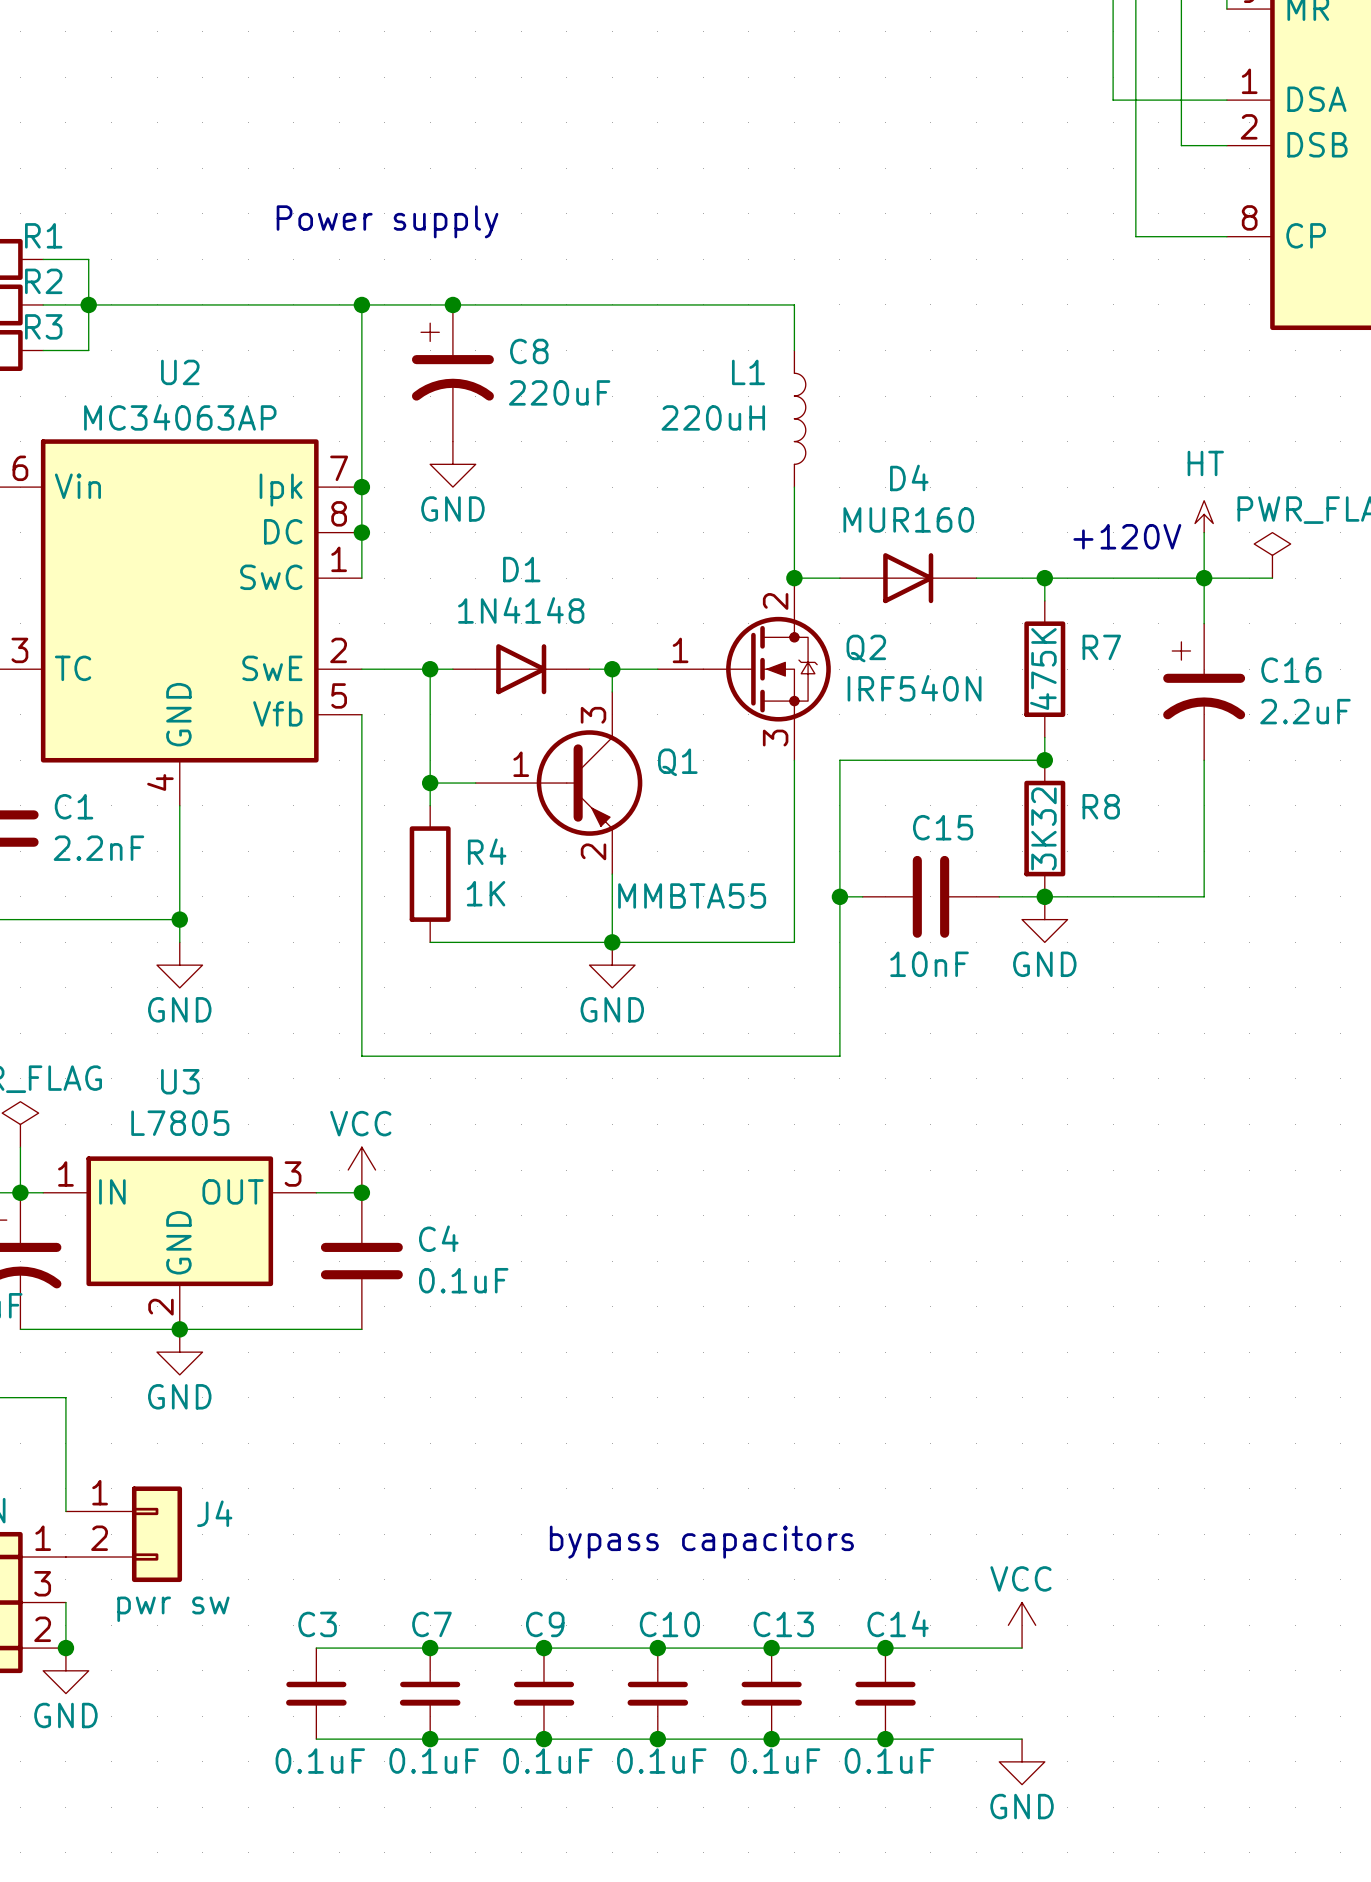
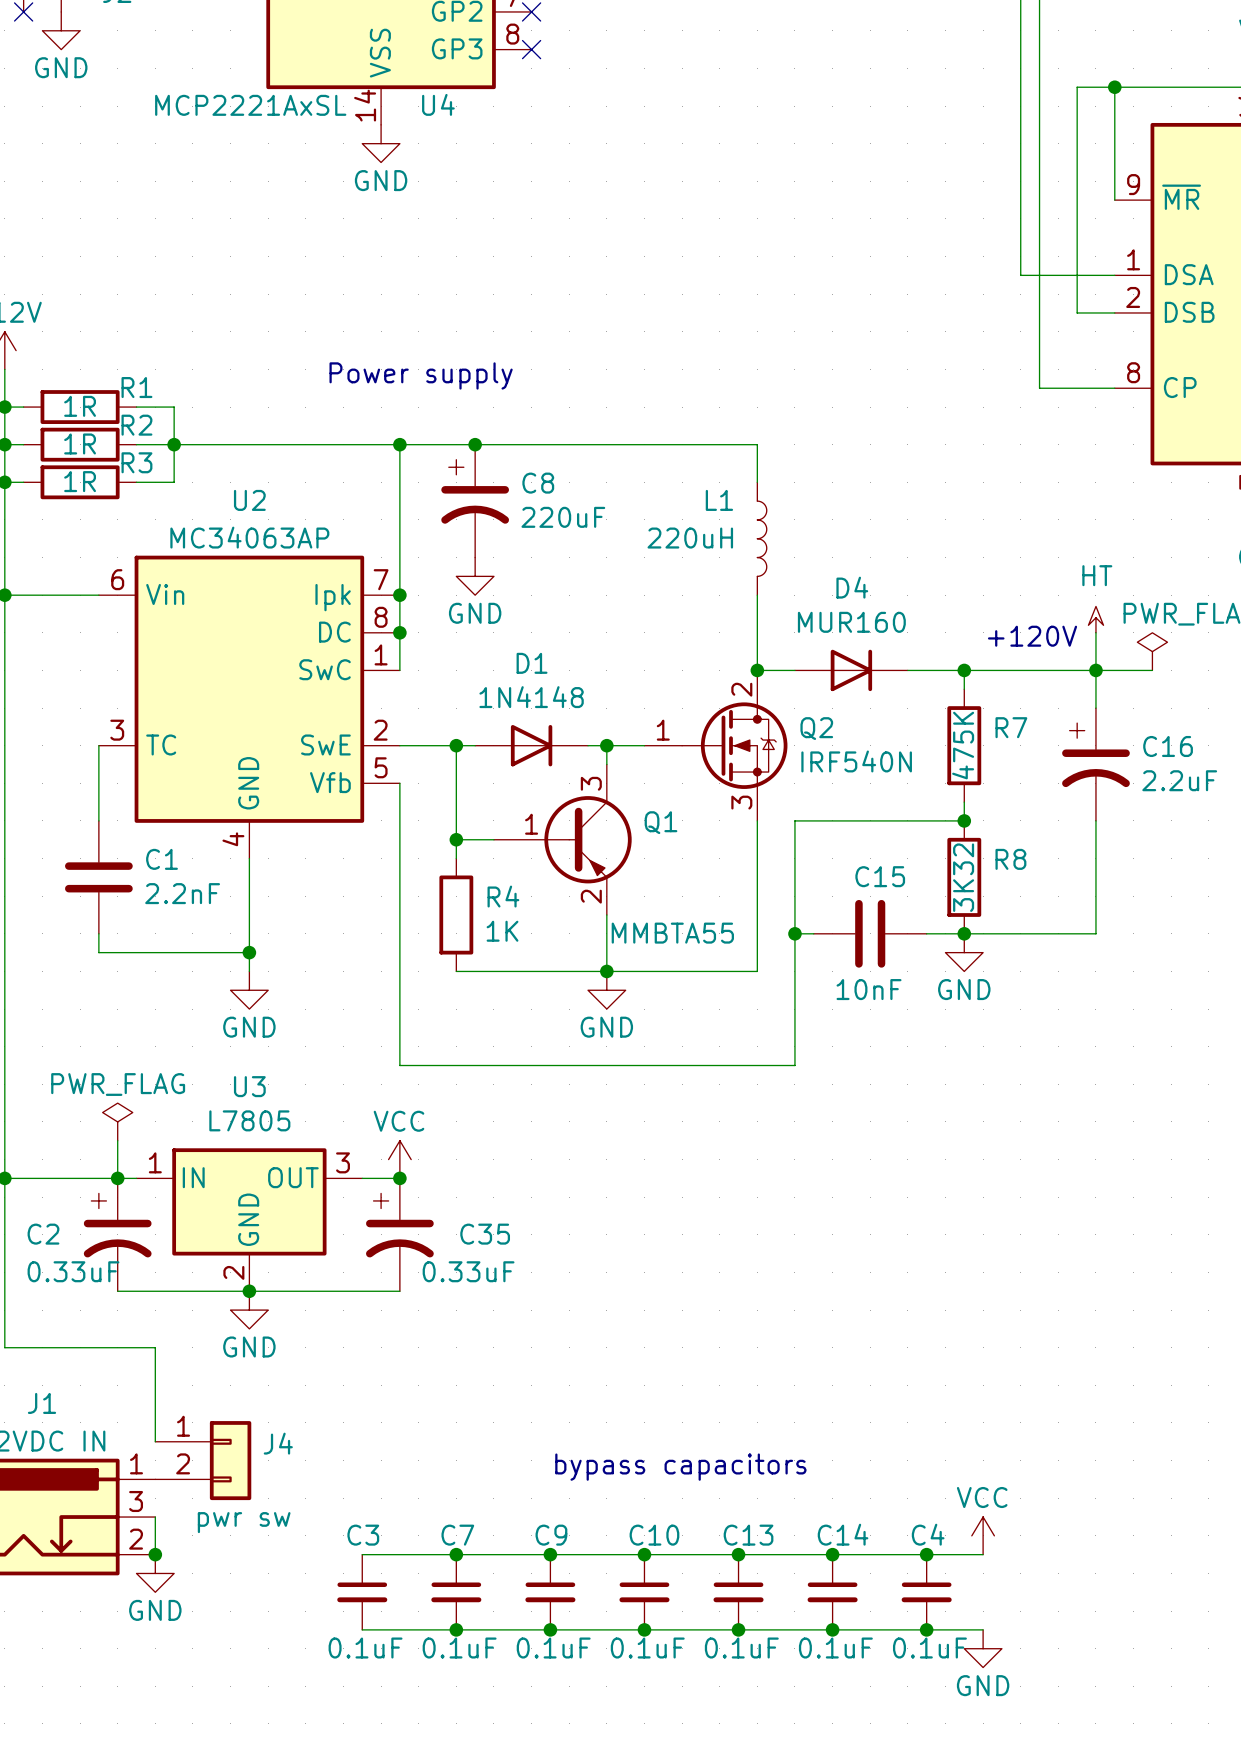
C4 symbol: [320, 1192, 403, 1330] -> [901, 1554, 952, 1630]
C4 name position: C4 (438, 1238) -> C4 (928, 1534)
C35: none -> 0.33uF (399, 1234)
C4 value position: 0.1uF (463, 1280) -> 0.1uF (929, 1648)
power symbol position: VCC (1022, 1625) -> VCC (983, 1535)
junction: none -> (926, 1554)
wire: none -> (945, 1554) (983, 1554)
junction: none -> (926, 1629)
wire: none -> (945, 1629) (983, 1629)
power symbol position: GND (1022, 1761) -> GND (983, 1648)

